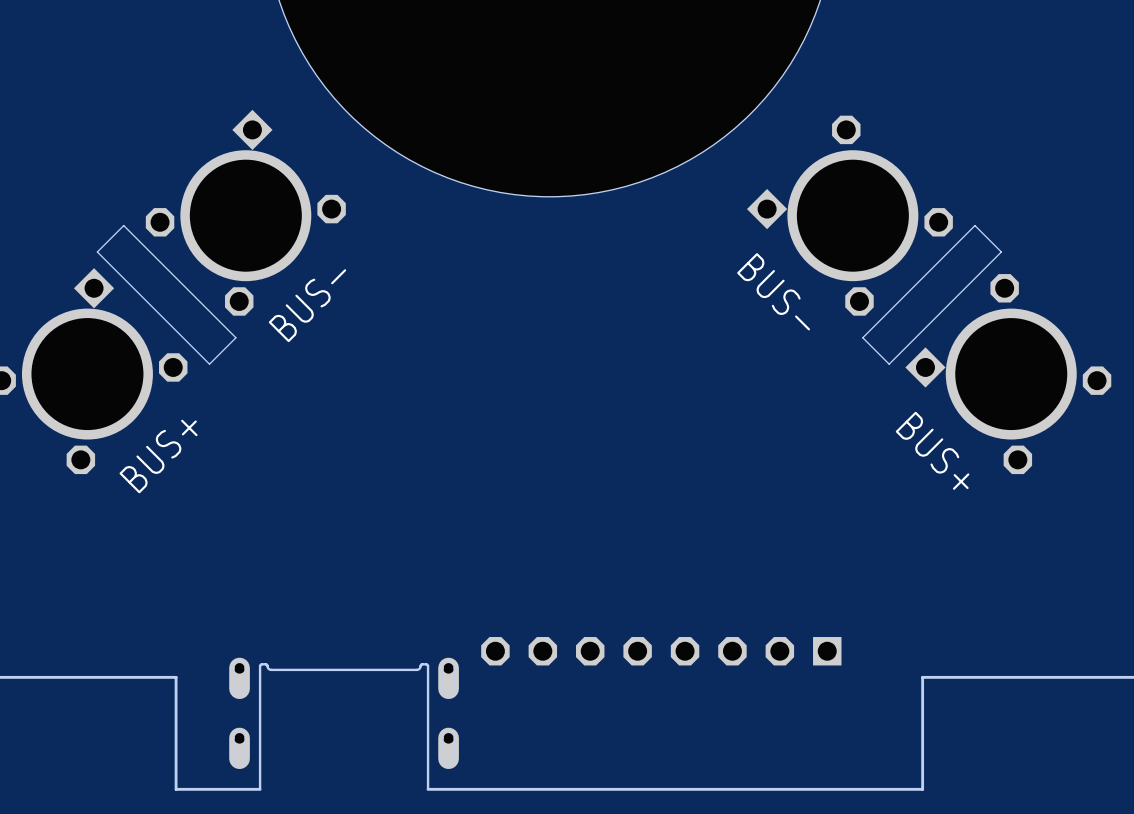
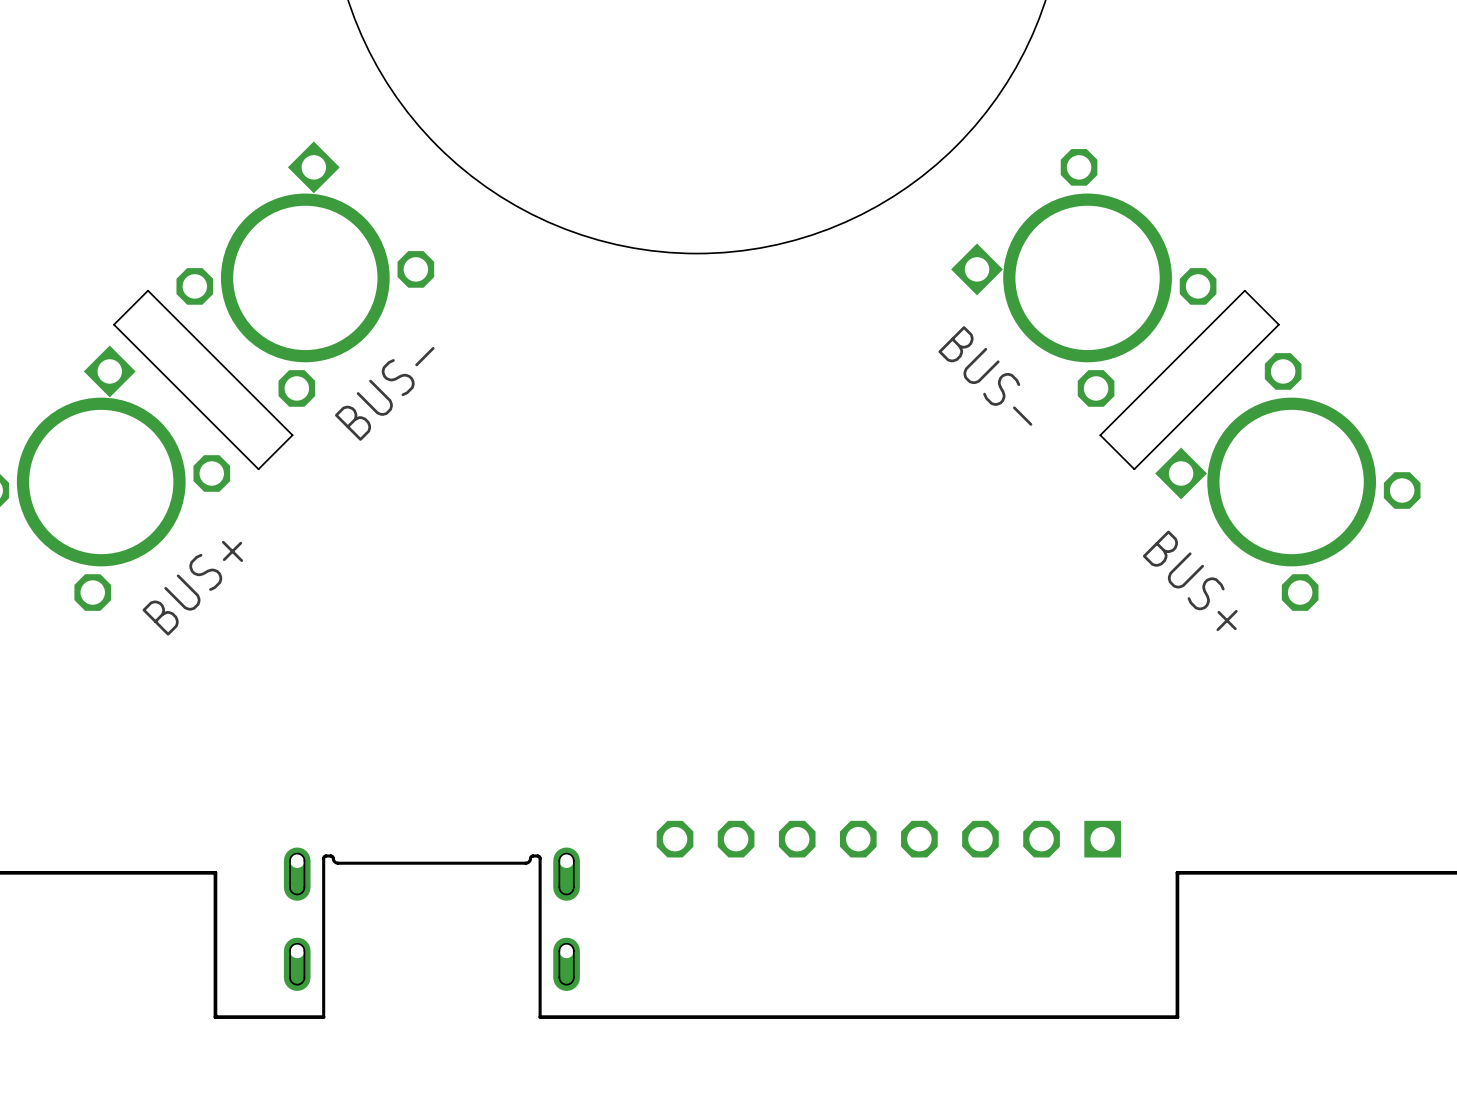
part position: (661, 651) -> (888, 839)

